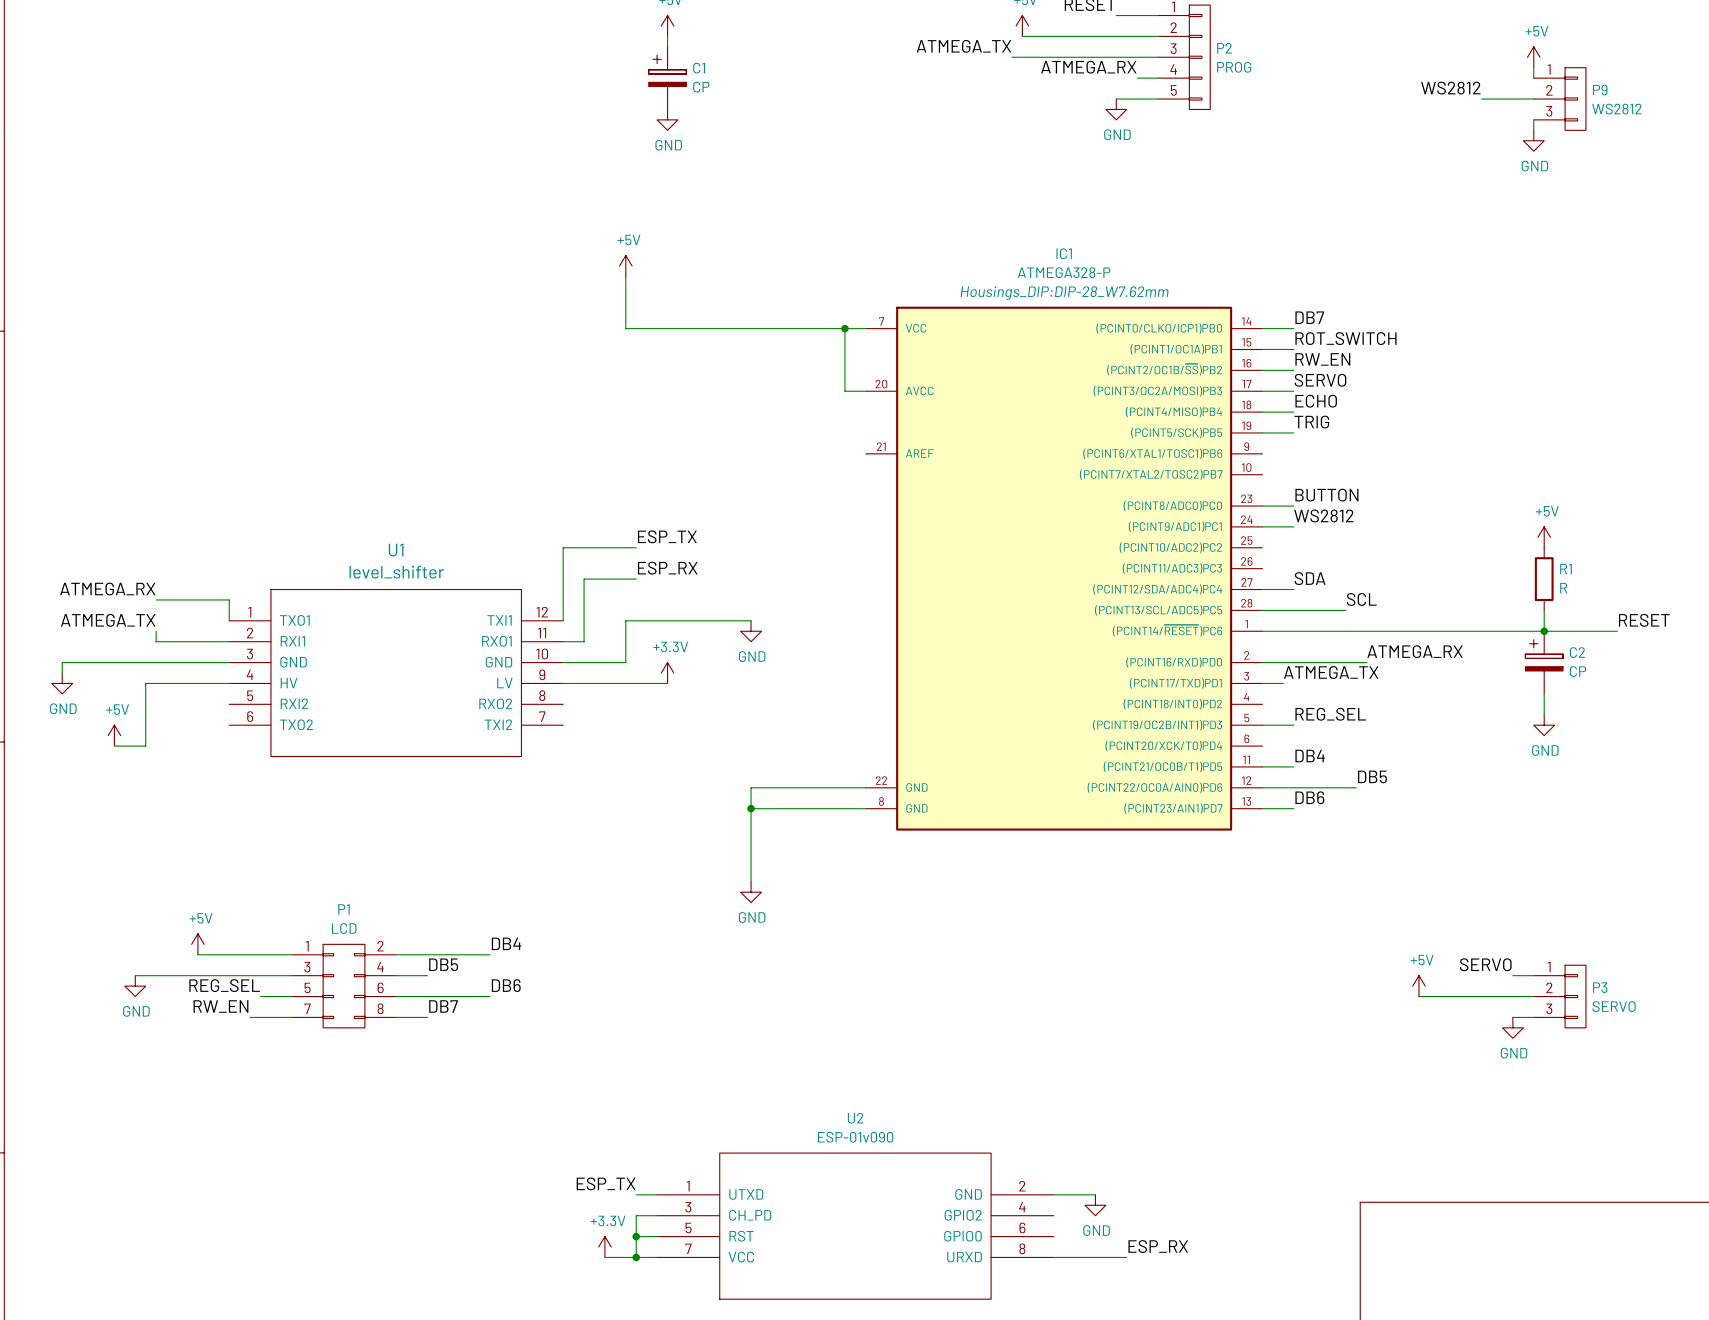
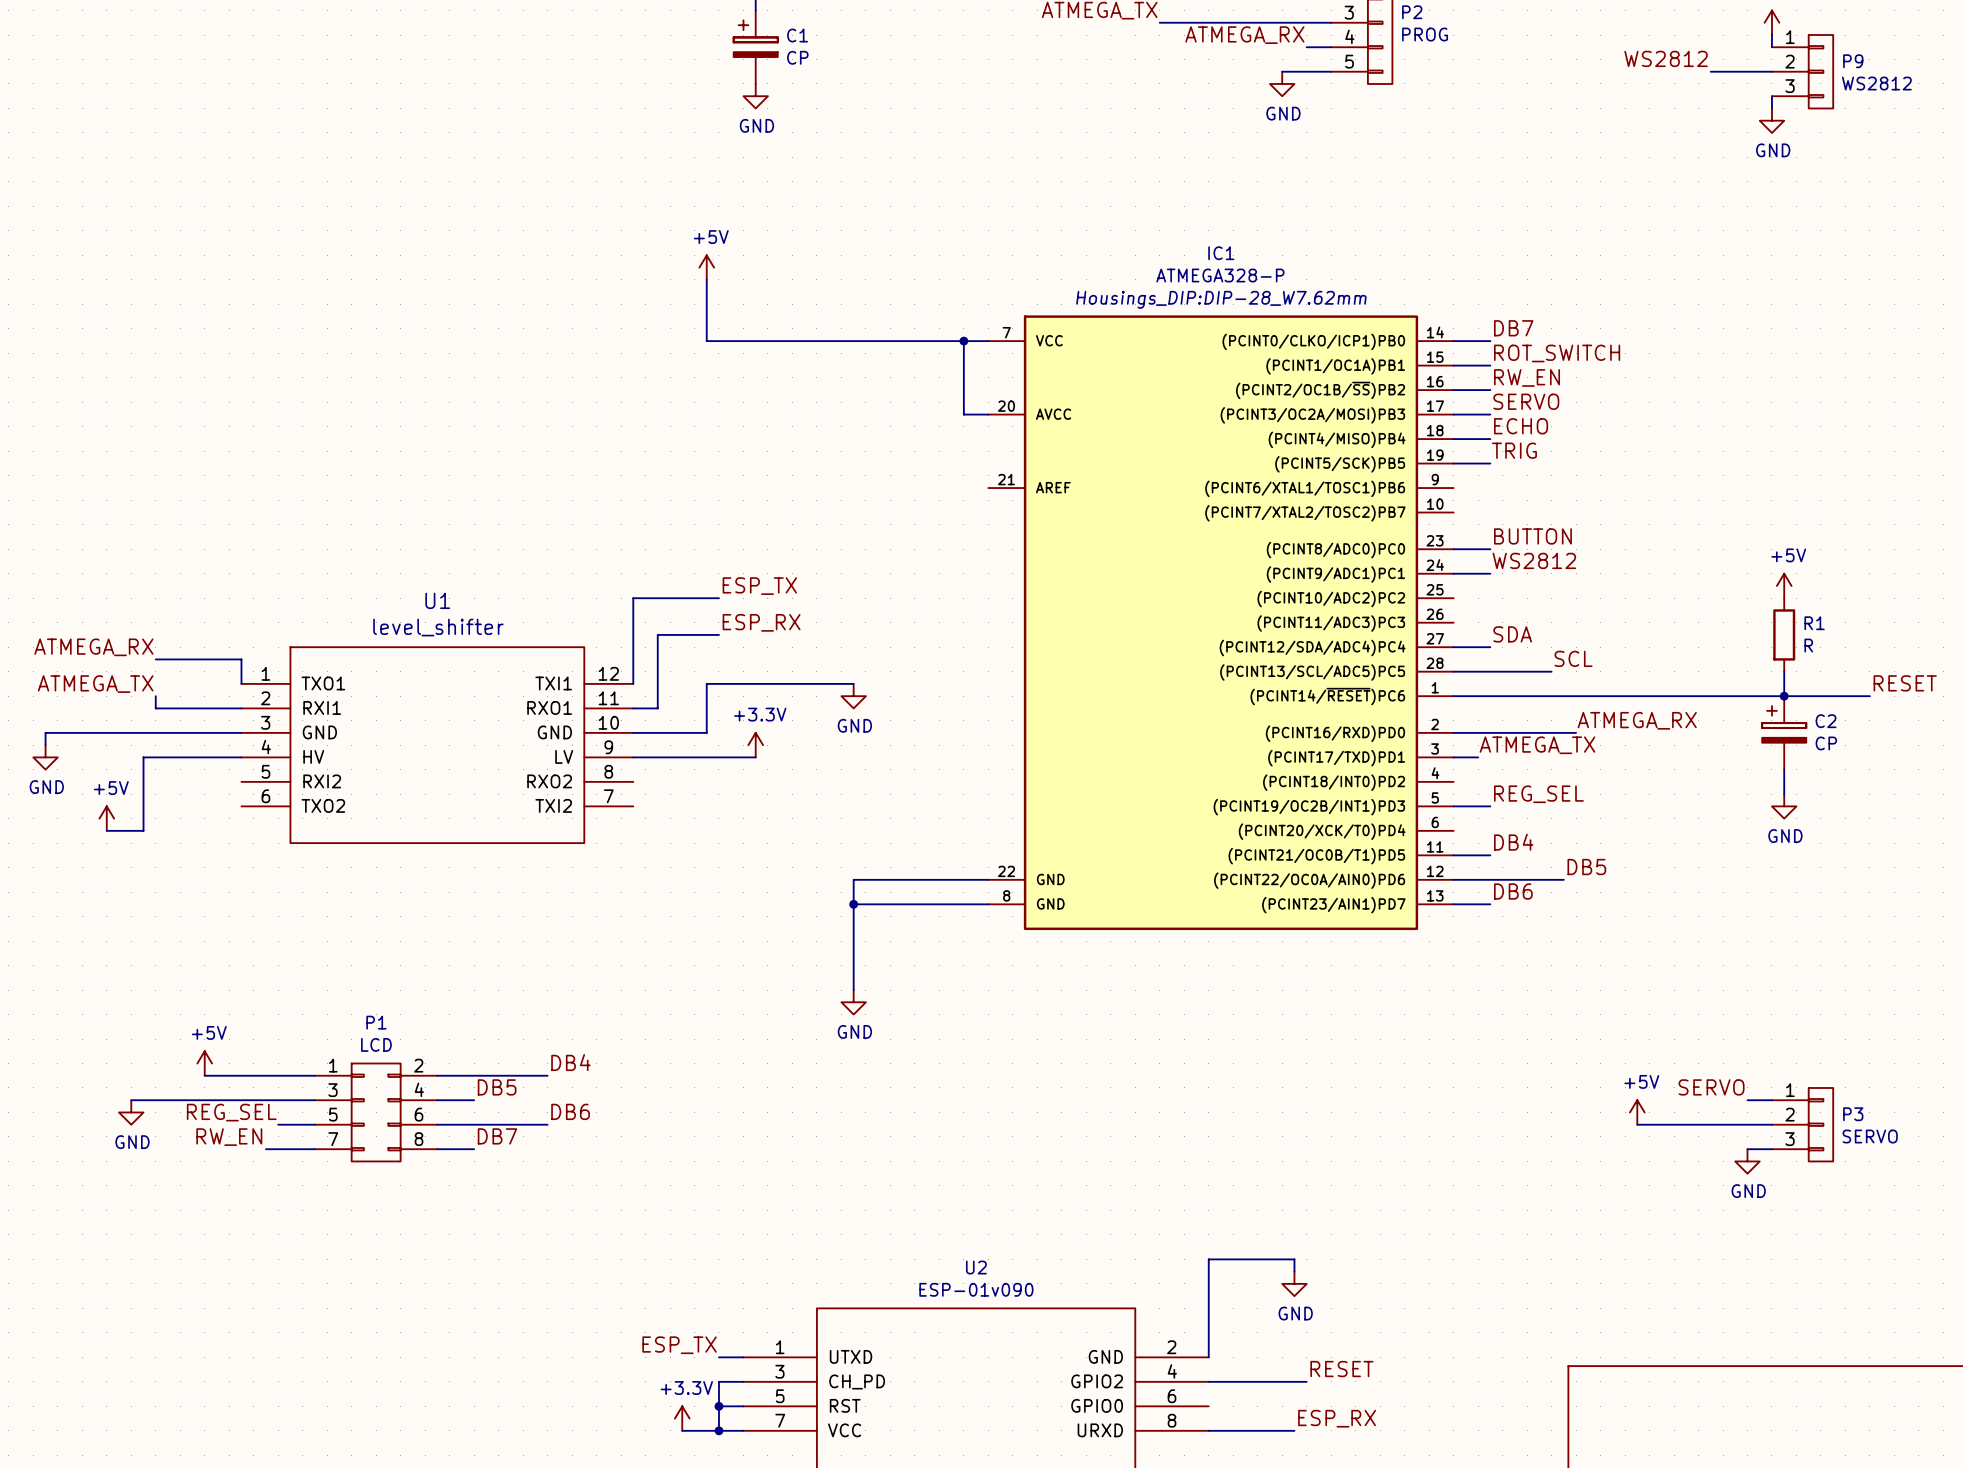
wire: (1053, 1194) (1095, 1194) -> (1208, 1357) (1208, 1259) (1294, 1259) (1294, 1271)
label: none -> RESET (1341, 1369)
power symbol position: GND (1095, 1205) -> GND (1294, 1283)
wire: none -> (1208, 1381) (1306, 1381)

